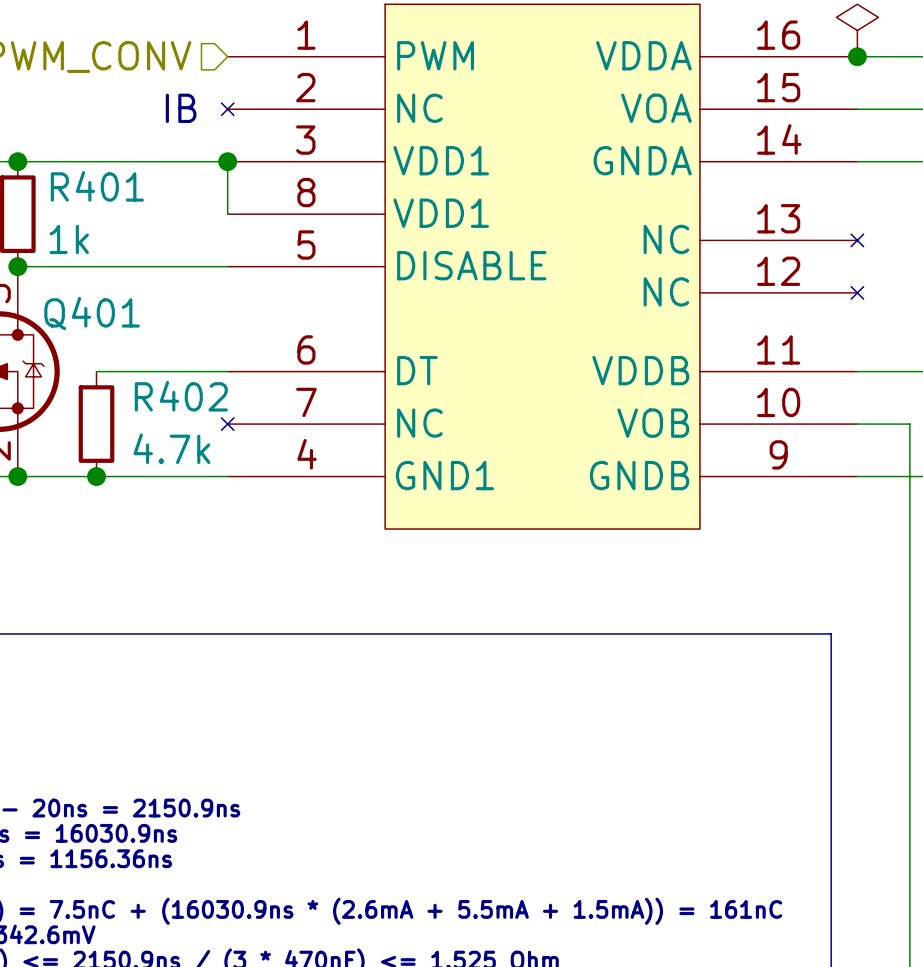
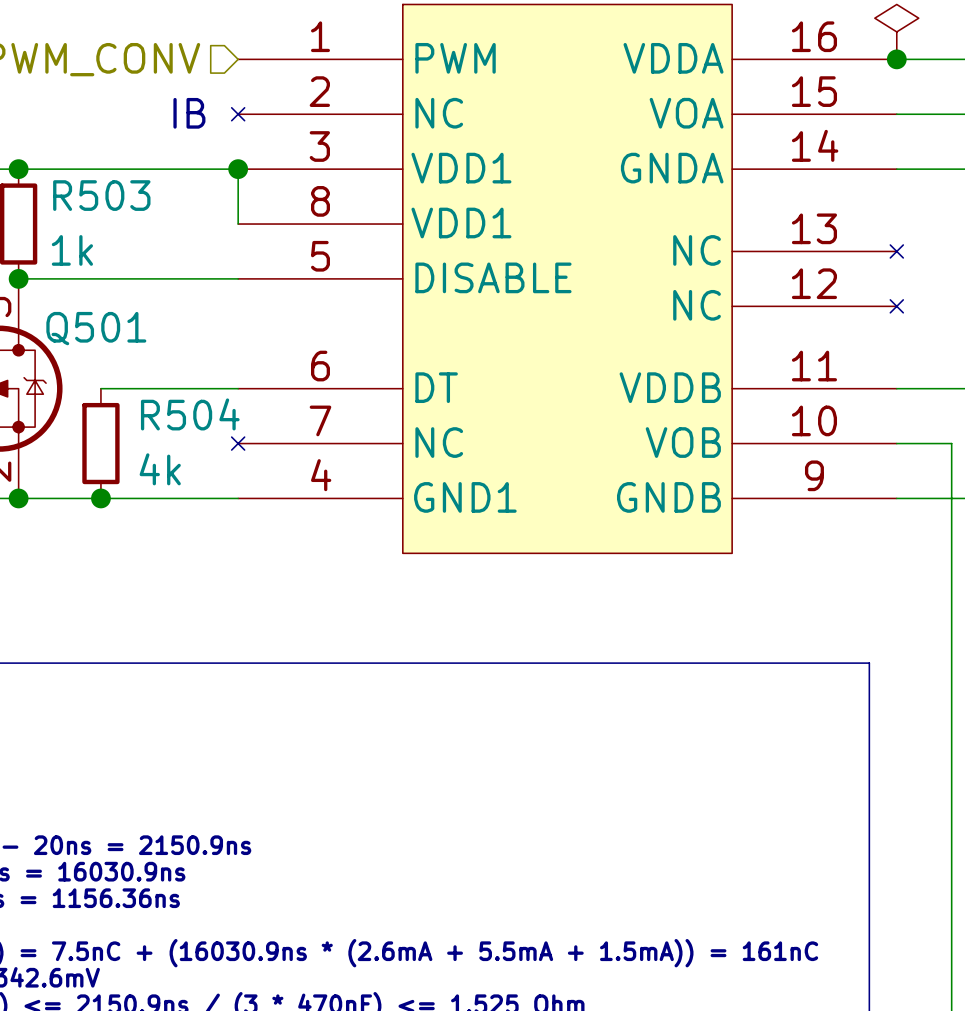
R401 name: R401 (97, 186) -> R503 (101, 195)
Q401 name: Q401 (92, 313) -> Q501 (96, 328)
R402 name: R402 (181, 396) -> R504 (190, 414)
R402 value: 4.7k (171, 448) -> 4k (160, 469)

